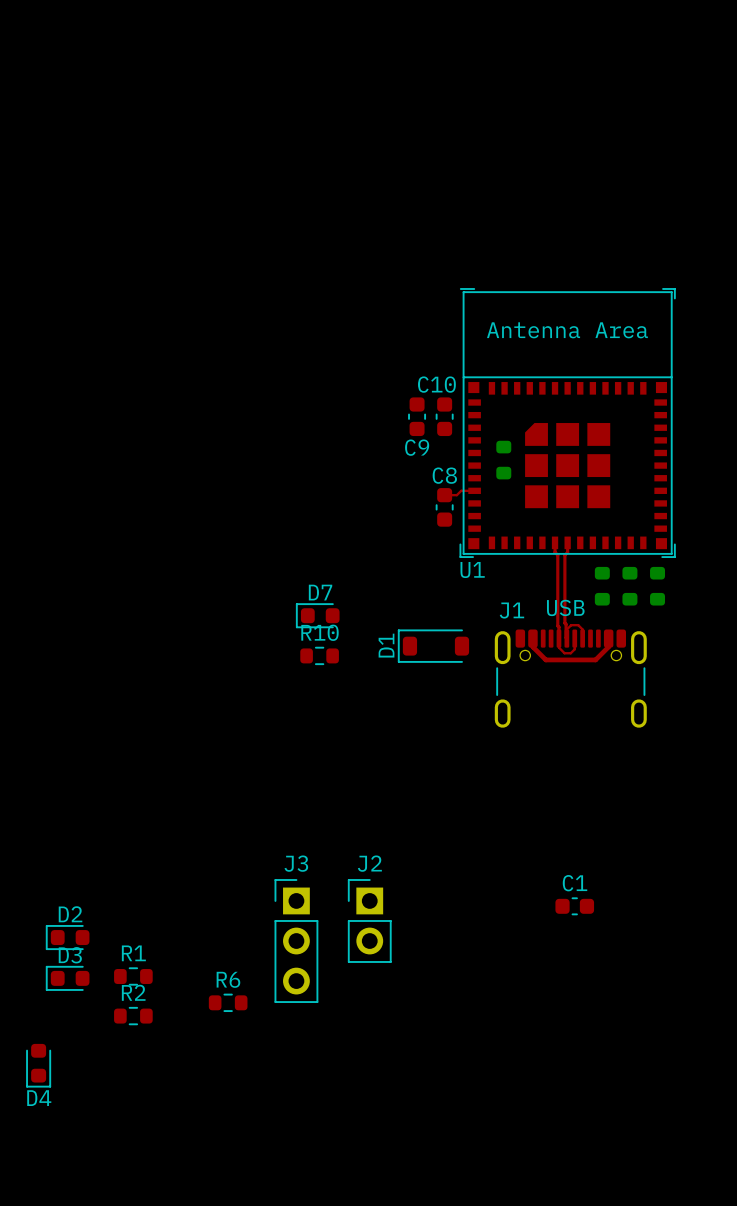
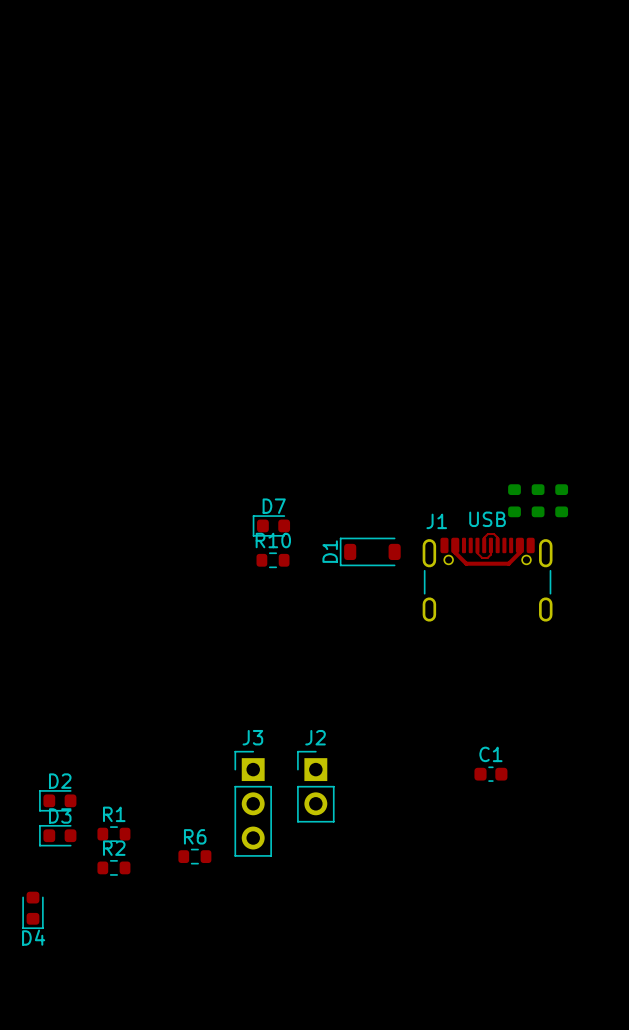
C9: (417, 416) -> none
C10: (444, 416) -> none
U1: (567, 423) -> none
part: (503, 460) -> none
top track: (474, 490) (461, 490) (456, 495) (444, 495) -> none
C8: (444, 507) -> none
top track: (555, 542) (555, 552) (557, 555) (558, 638) -> none
top track: (567, 542) (567, 552) (564, 555) (564, 623) (566, 638) -> none

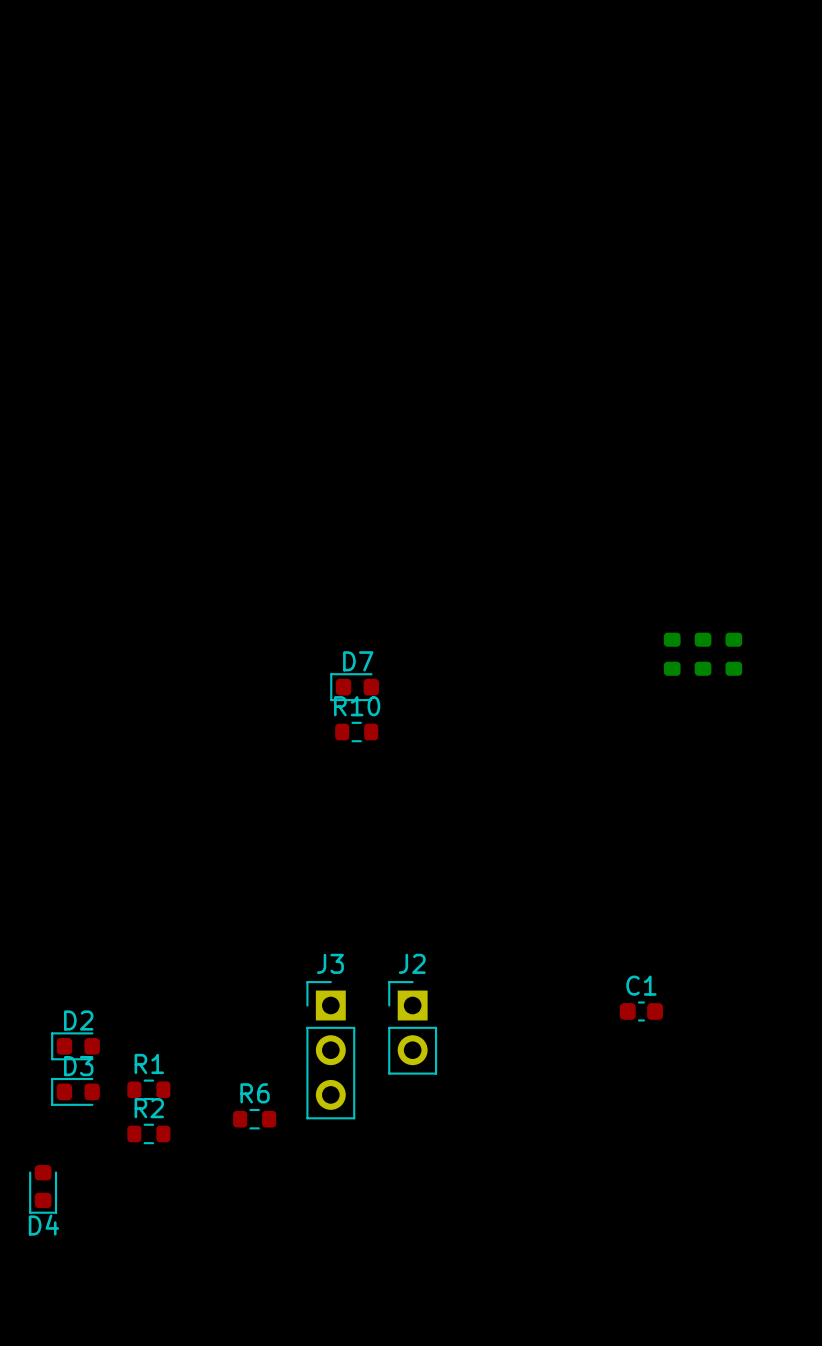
text: USB (487, 519) -> none
top track: (455, 545) (455, 552) (466, 563) (508, 563) (519, 552) (519, 545) -> none
top track: (477, 545) (477, 553) (482, 557) (487, 557) (490, 554) (490, 545) -> none
top track: (484, 545) (484, 537) (487, 534) (493, 534) (497, 537) (497, 545) -> none
D1: (370, 551) -> none
J1: (487, 579) -> none

